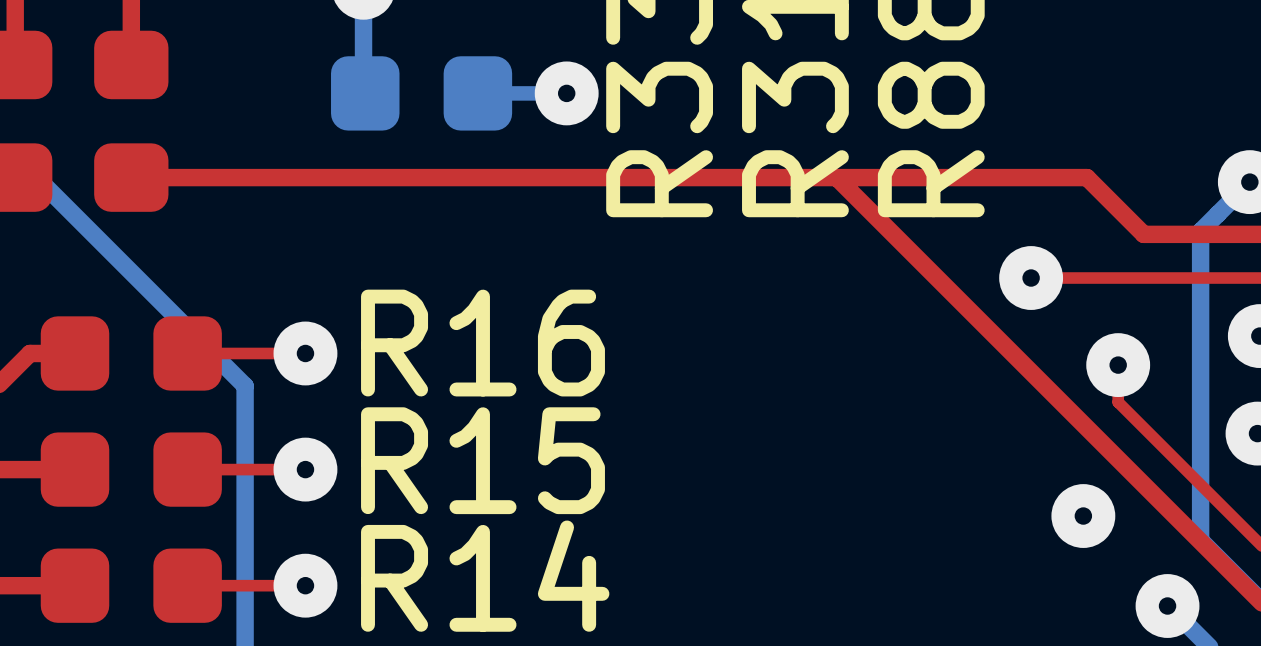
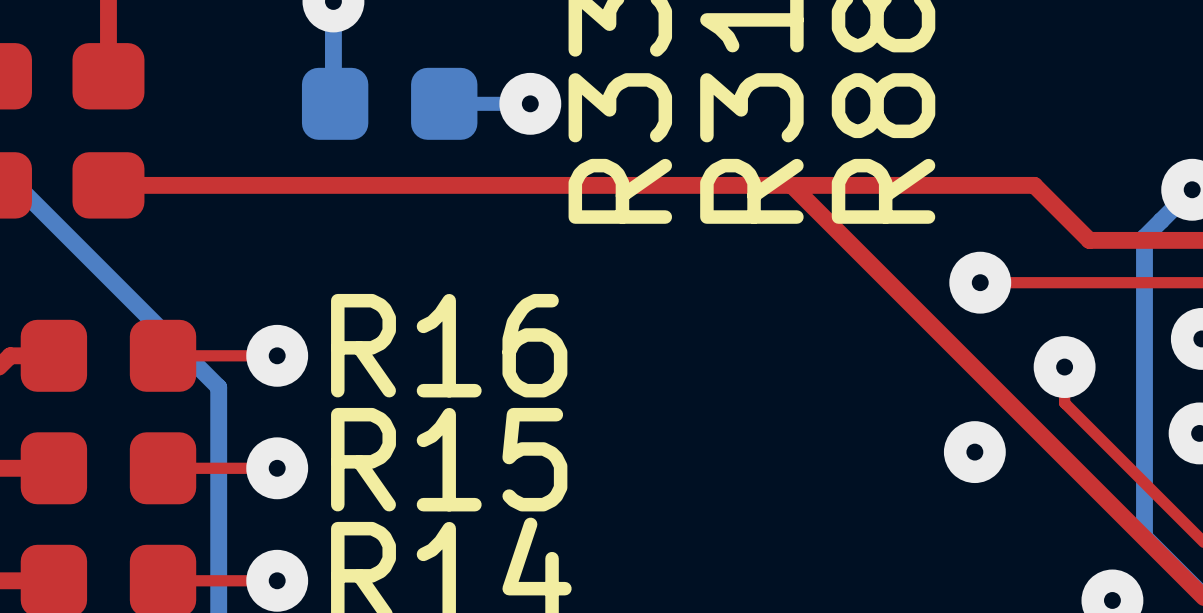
via position: (1083, 516) -> (974, 452)

